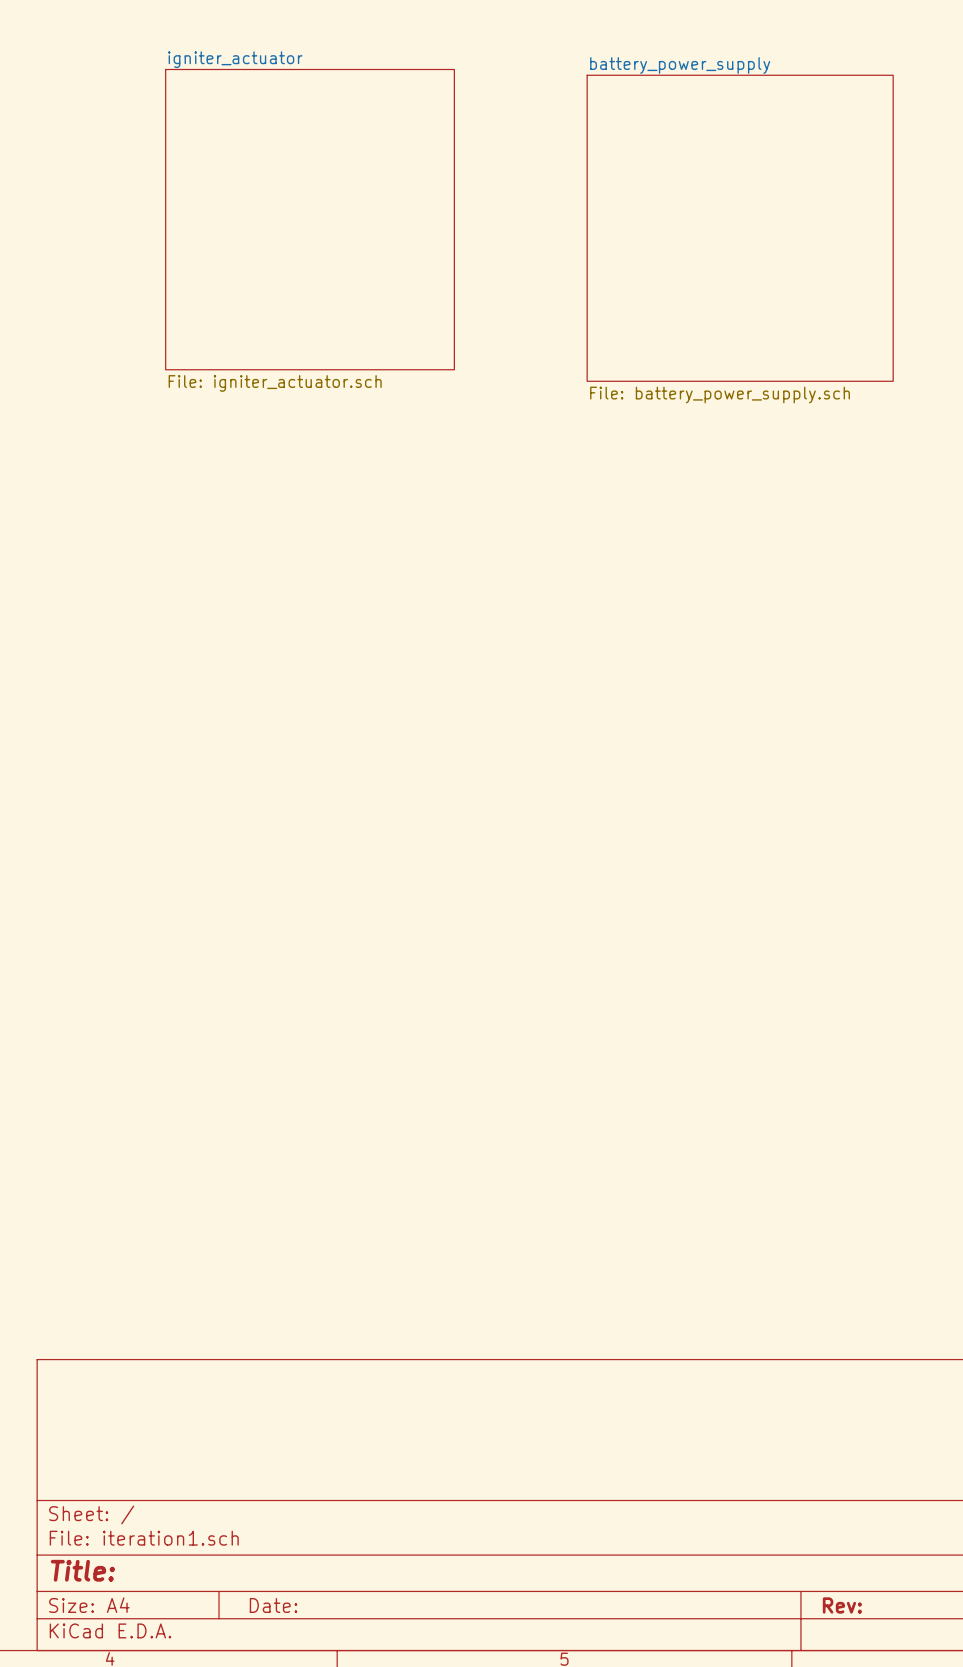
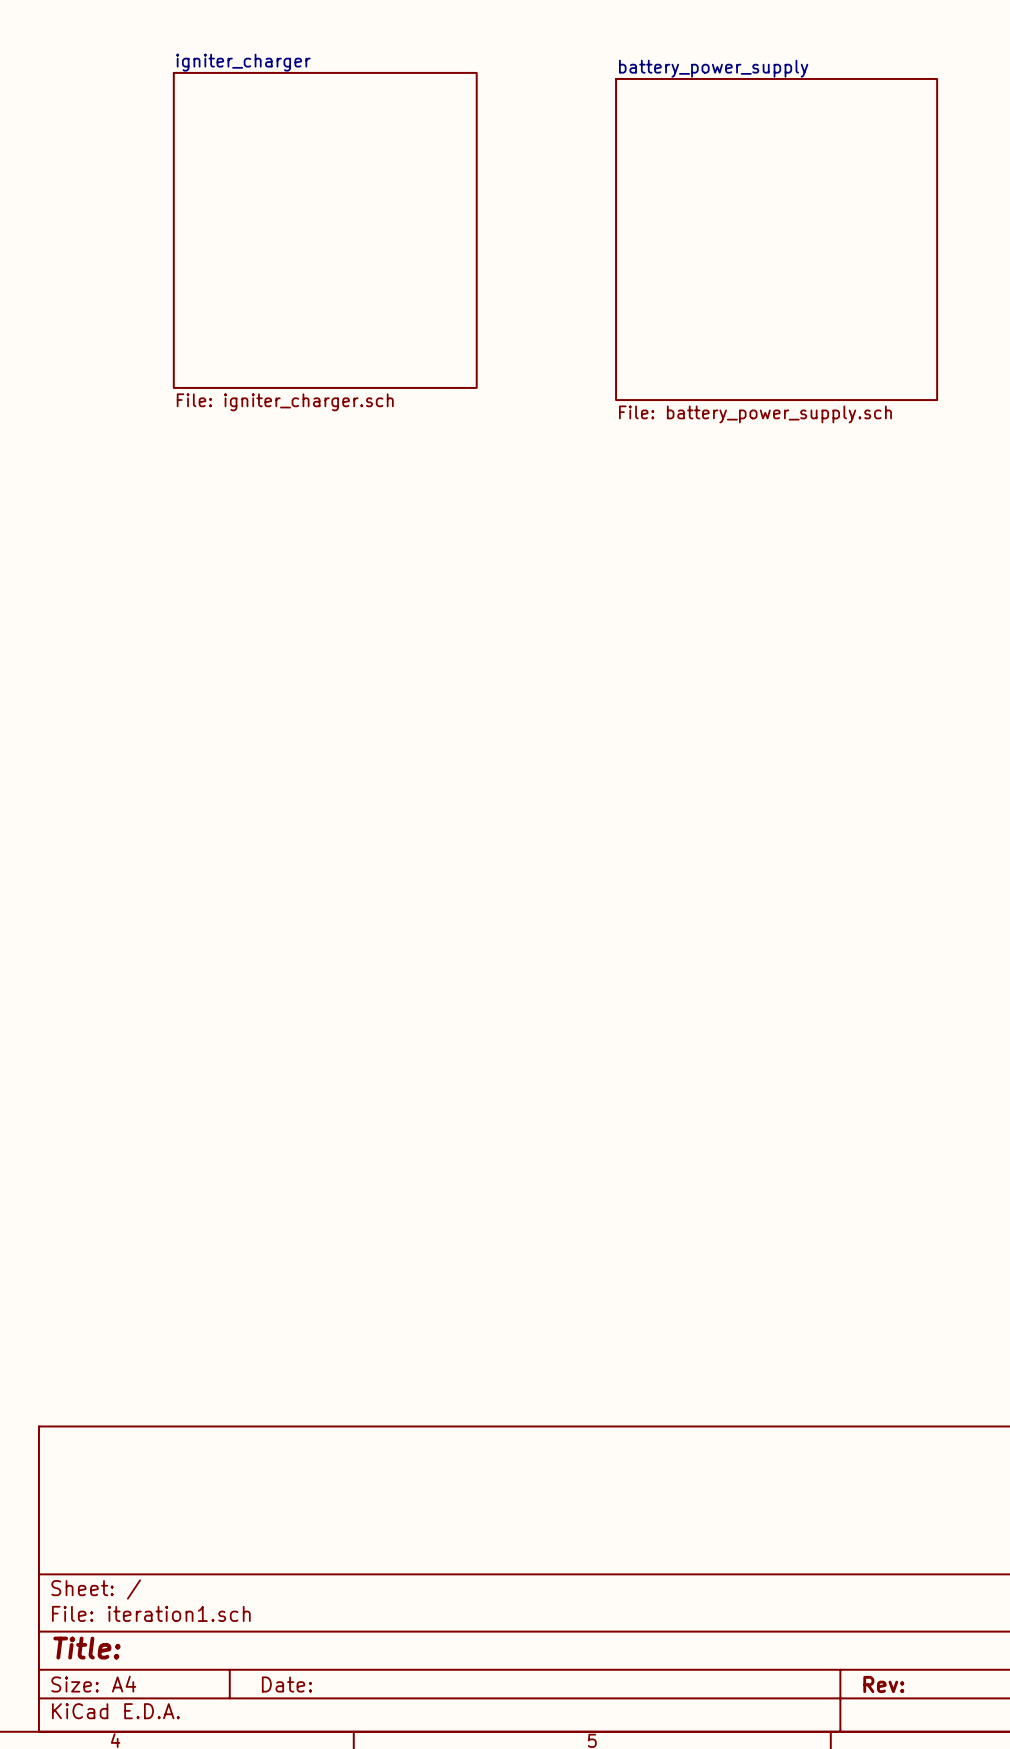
sheet igniter_actuator name: igniter_actuator (235, 59) -> igniter_charger (243, 62)
sheet igniter_actuator value: File: igniter_actuator.sch (275, 383) -> File: igniter_charger.sch (285, 402)

